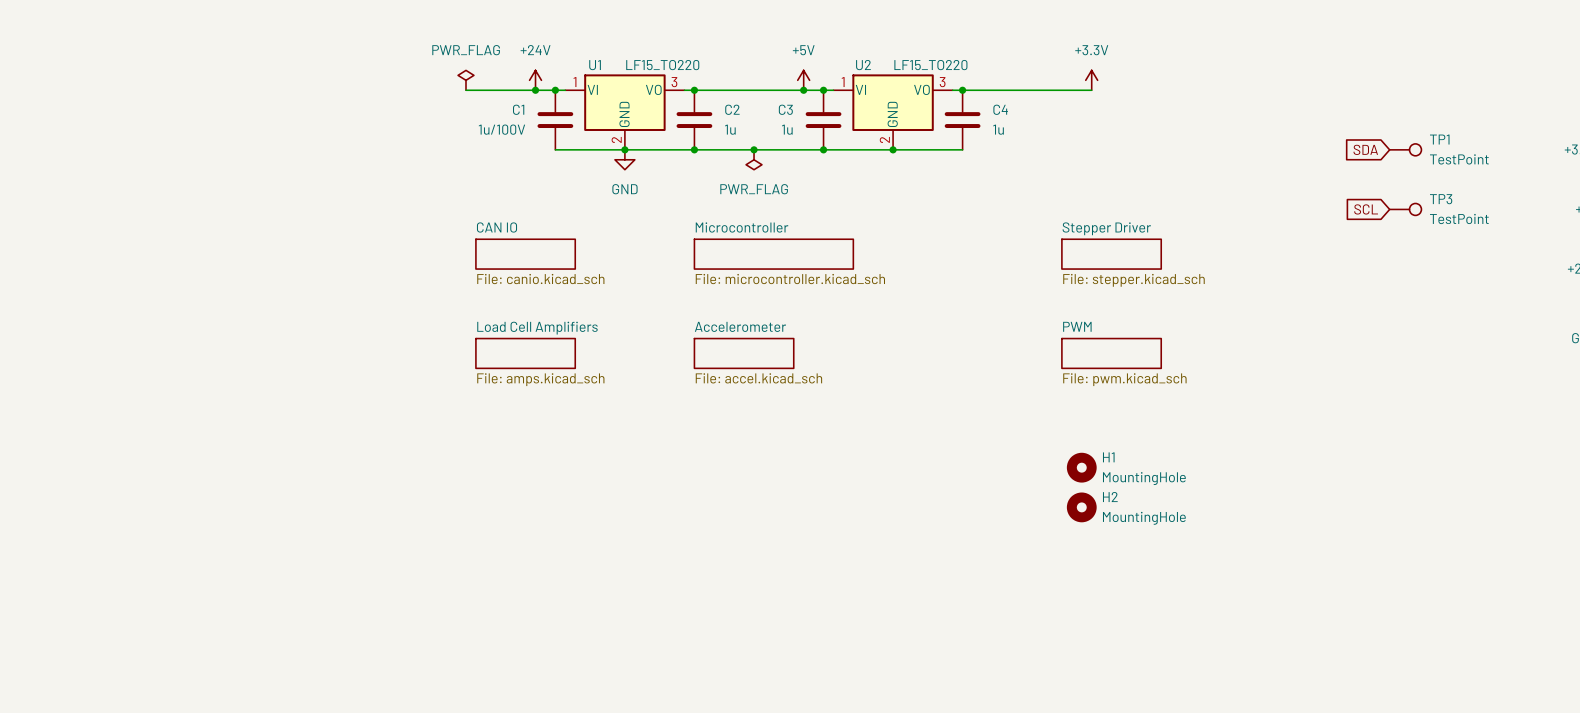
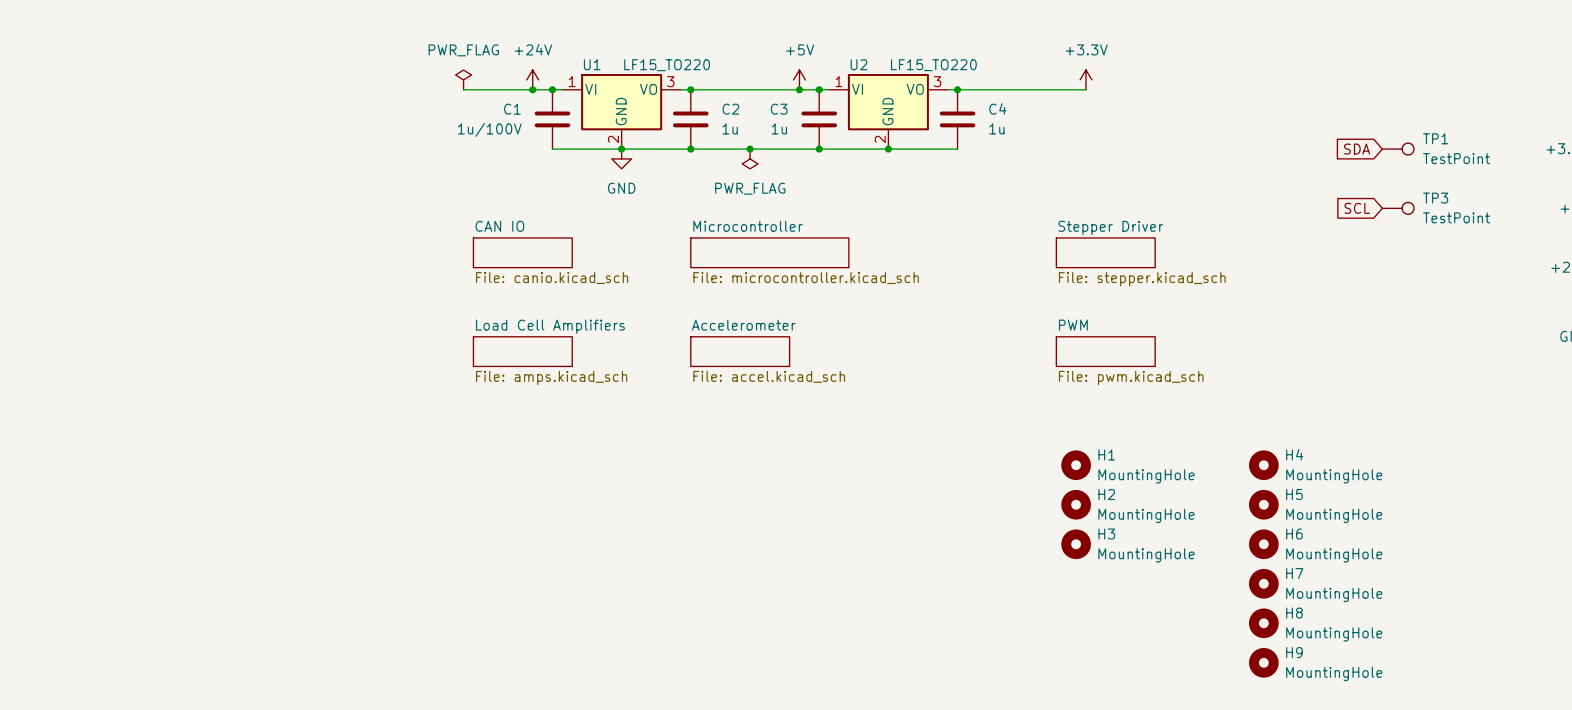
H4: none -> MountingHole (1263, 465)
H5: none -> MountingHole (1263, 504)
H3: none -> MountingHole (1076, 544)
H6: none -> MountingHole (1263, 544)
H7: none -> MountingHole (1263, 583)
H8: none -> MountingHole (1263, 623)
H9: none -> MountingHole (1263, 662)

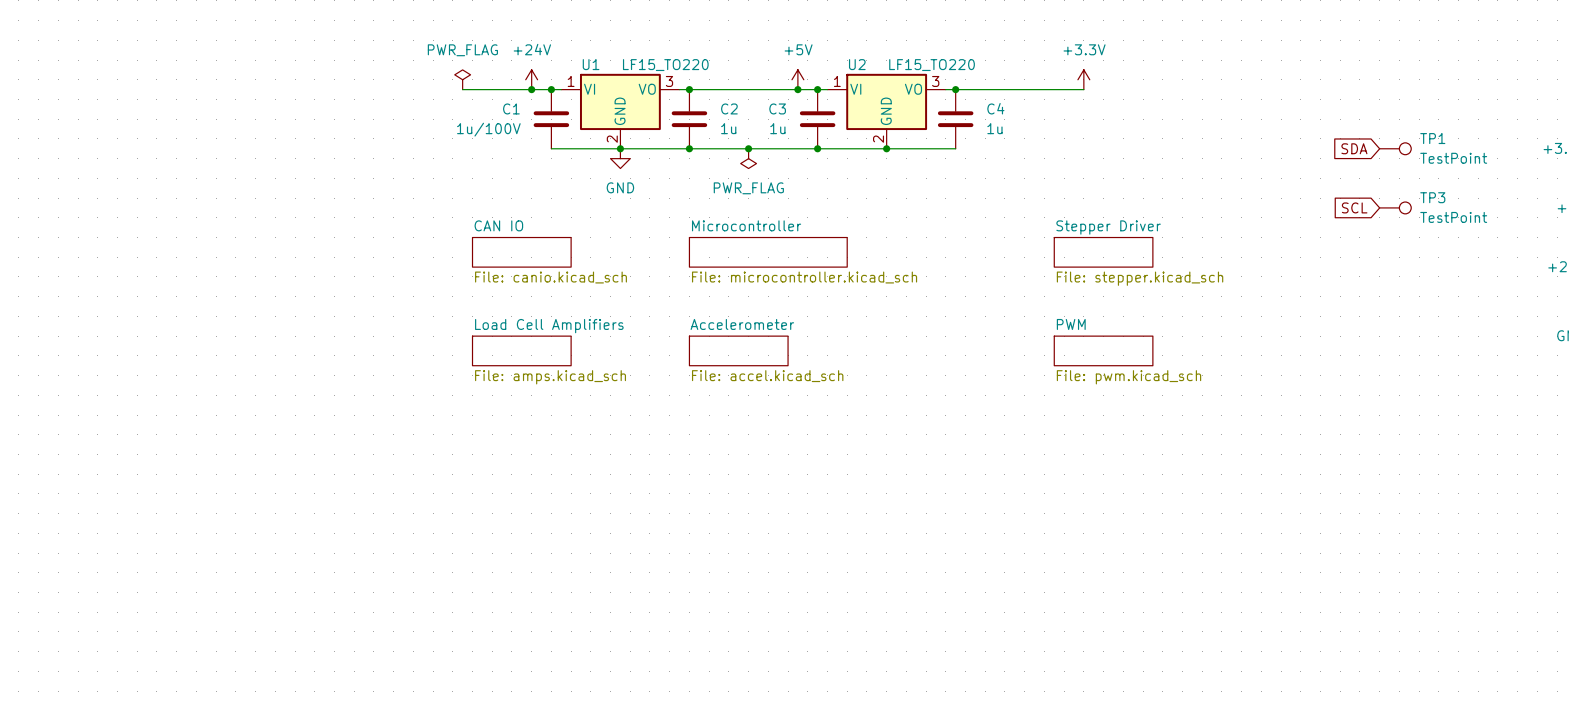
H1: MountingHole (1076, 465) -> none
H4: MountingHole (1263, 465) -> none
H2: MountingHole (1076, 504) -> none
H5: MountingHole (1263, 504) -> none
H3: MountingHole (1076, 544) -> none
H6: MountingHole (1263, 544) -> none
H7: MountingHole (1263, 583) -> none
H8: MountingHole (1263, 623) -> none
H9: MountingHole (1263, 662) -> none

